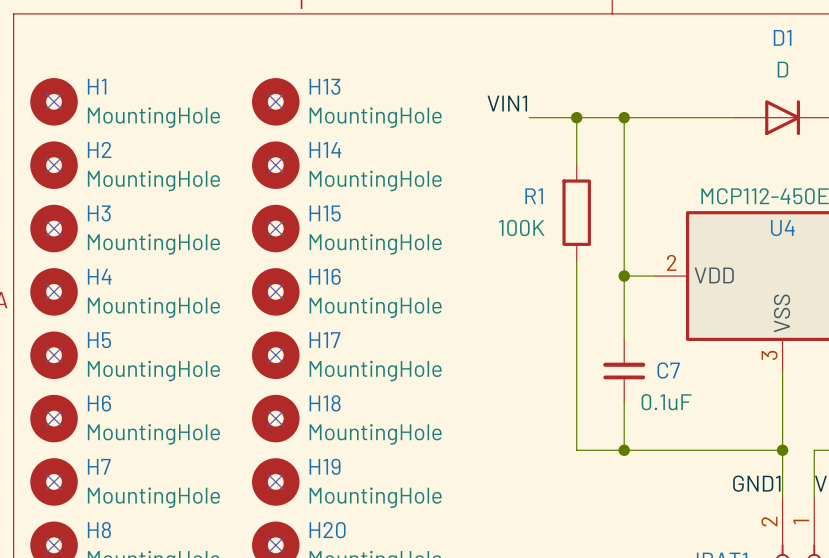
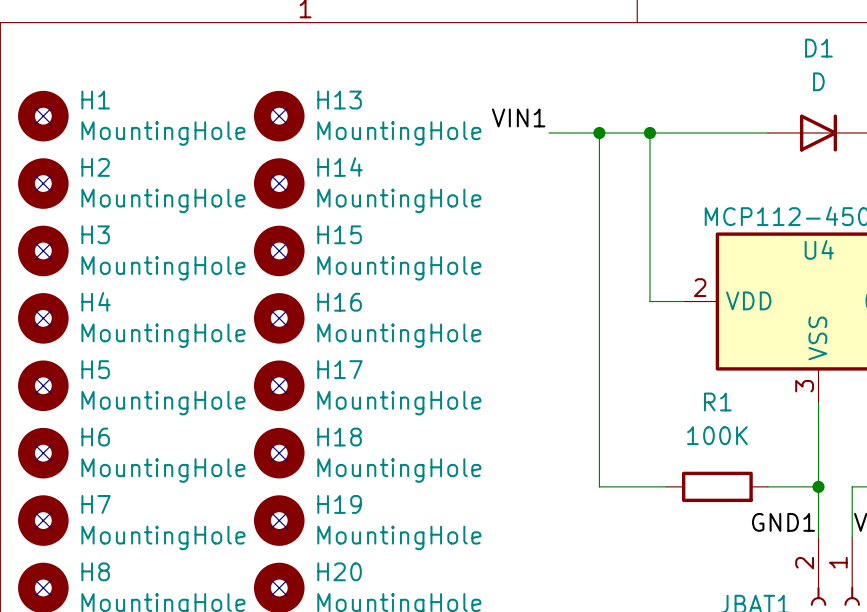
wire: none -> (599, 183) (599, 284)
R1 name position: R1 (534, 196) -> R1 (717, 401)
R1 rotation: 0° (576, 212) -> 90° clockwise (717, 486)
R1 position: (576, 212) -> (717, 486)
R1 value position: 100K (521, 227) -> 100K (717, 435)
wire: (624, 276) (624, 339) -> none
junction: (624, 276) -> none
C7: 0.1uF (624, 371) -> none
wire: (624, 402) (624, 450) -> none
junction: (624, 450) -> none
wire: (640, 450) (735, 450) -> none

